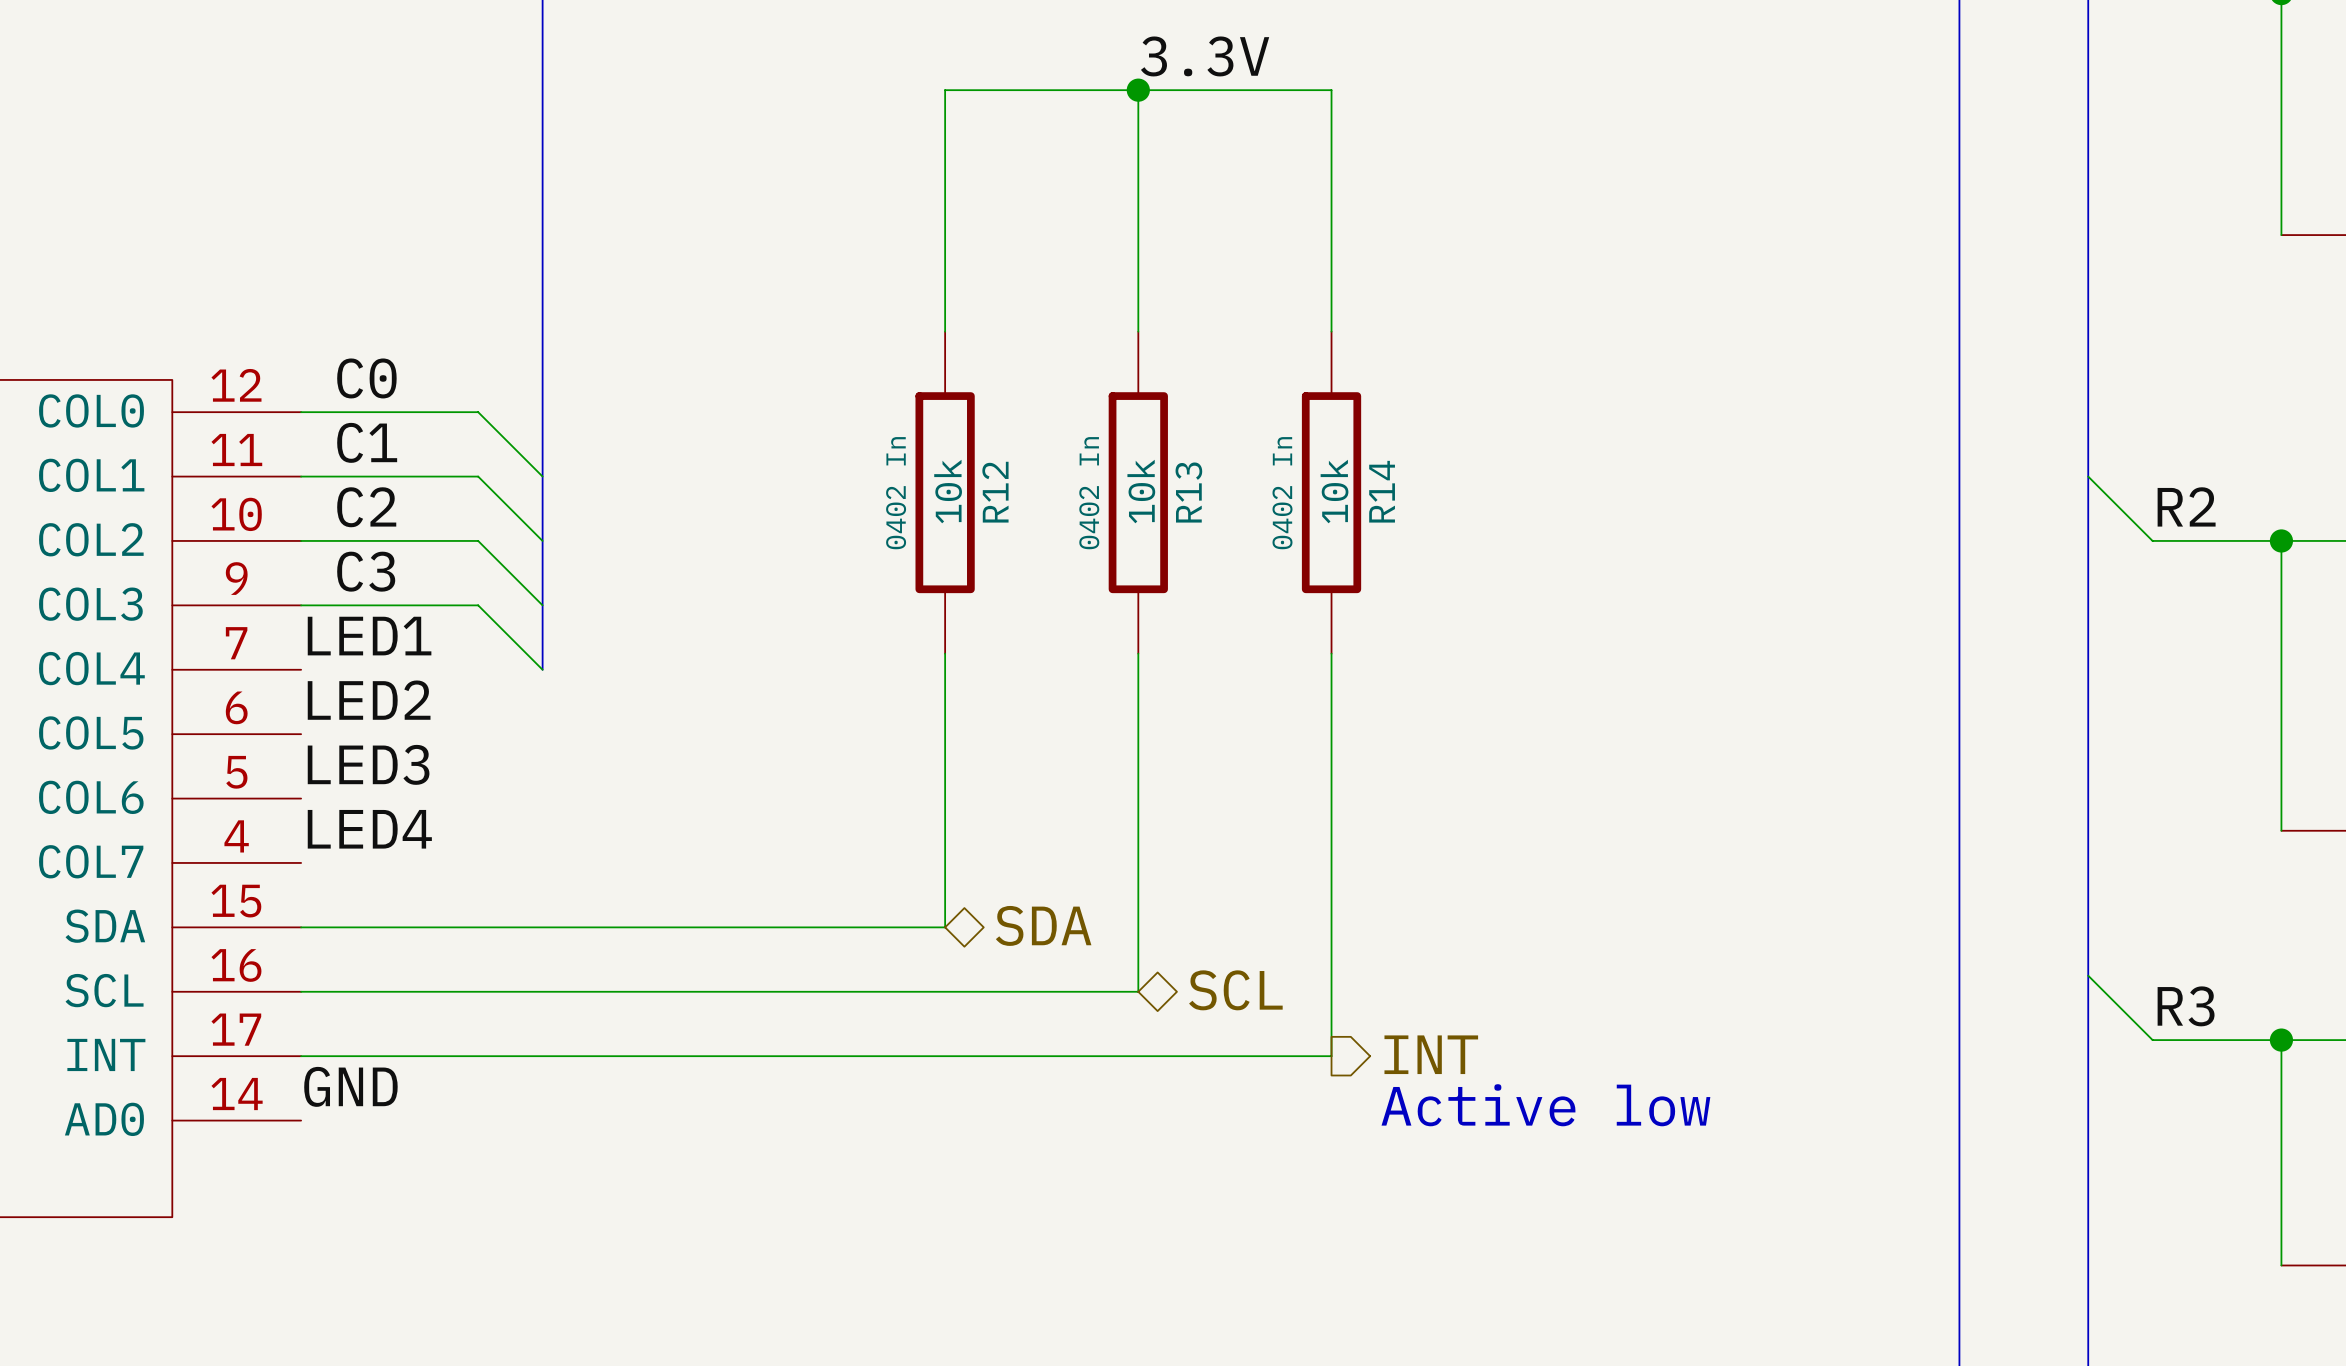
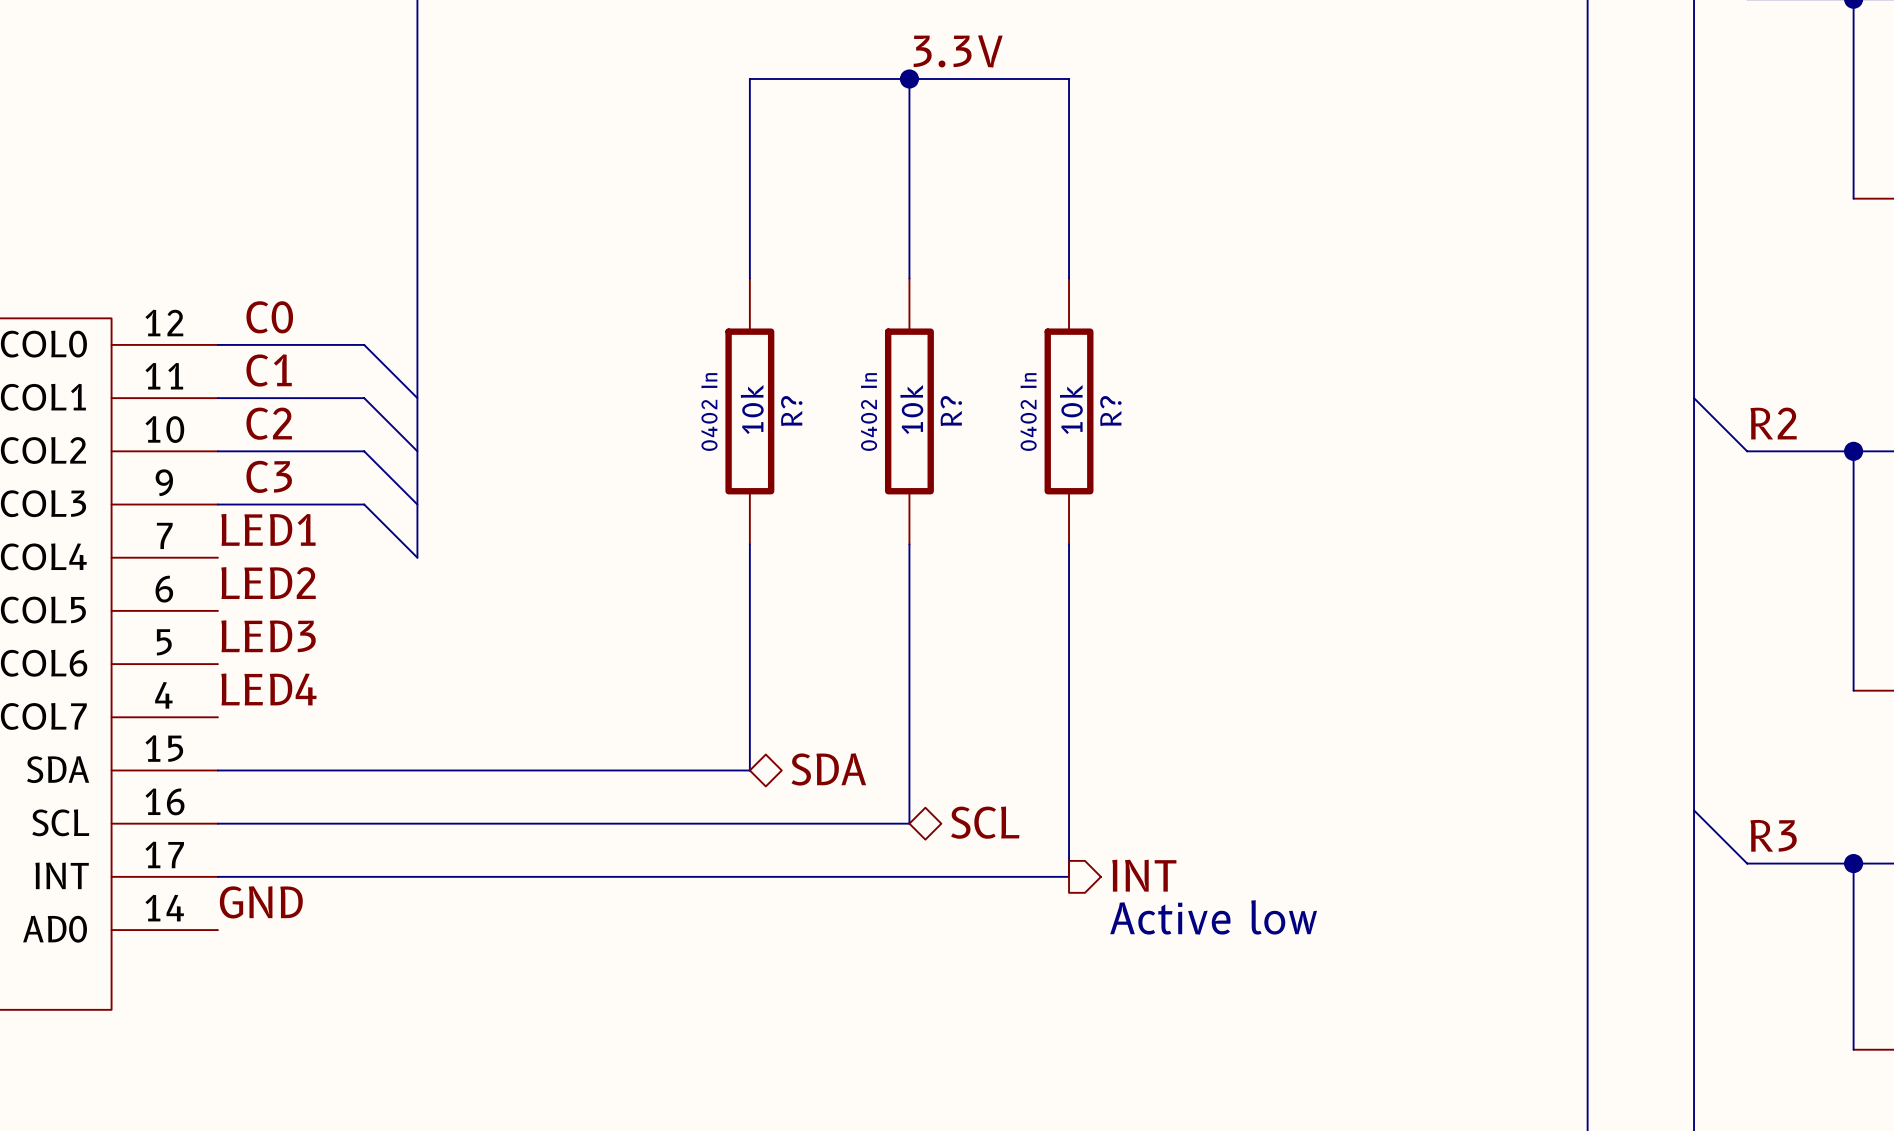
R14 name: R14 (1382, 491) -> R? (1110, 411)
R12 name: R12 (995, 492) -> R? (791, 411)
R13 name: R13 (1188, 492) -> R? (951, 411)

